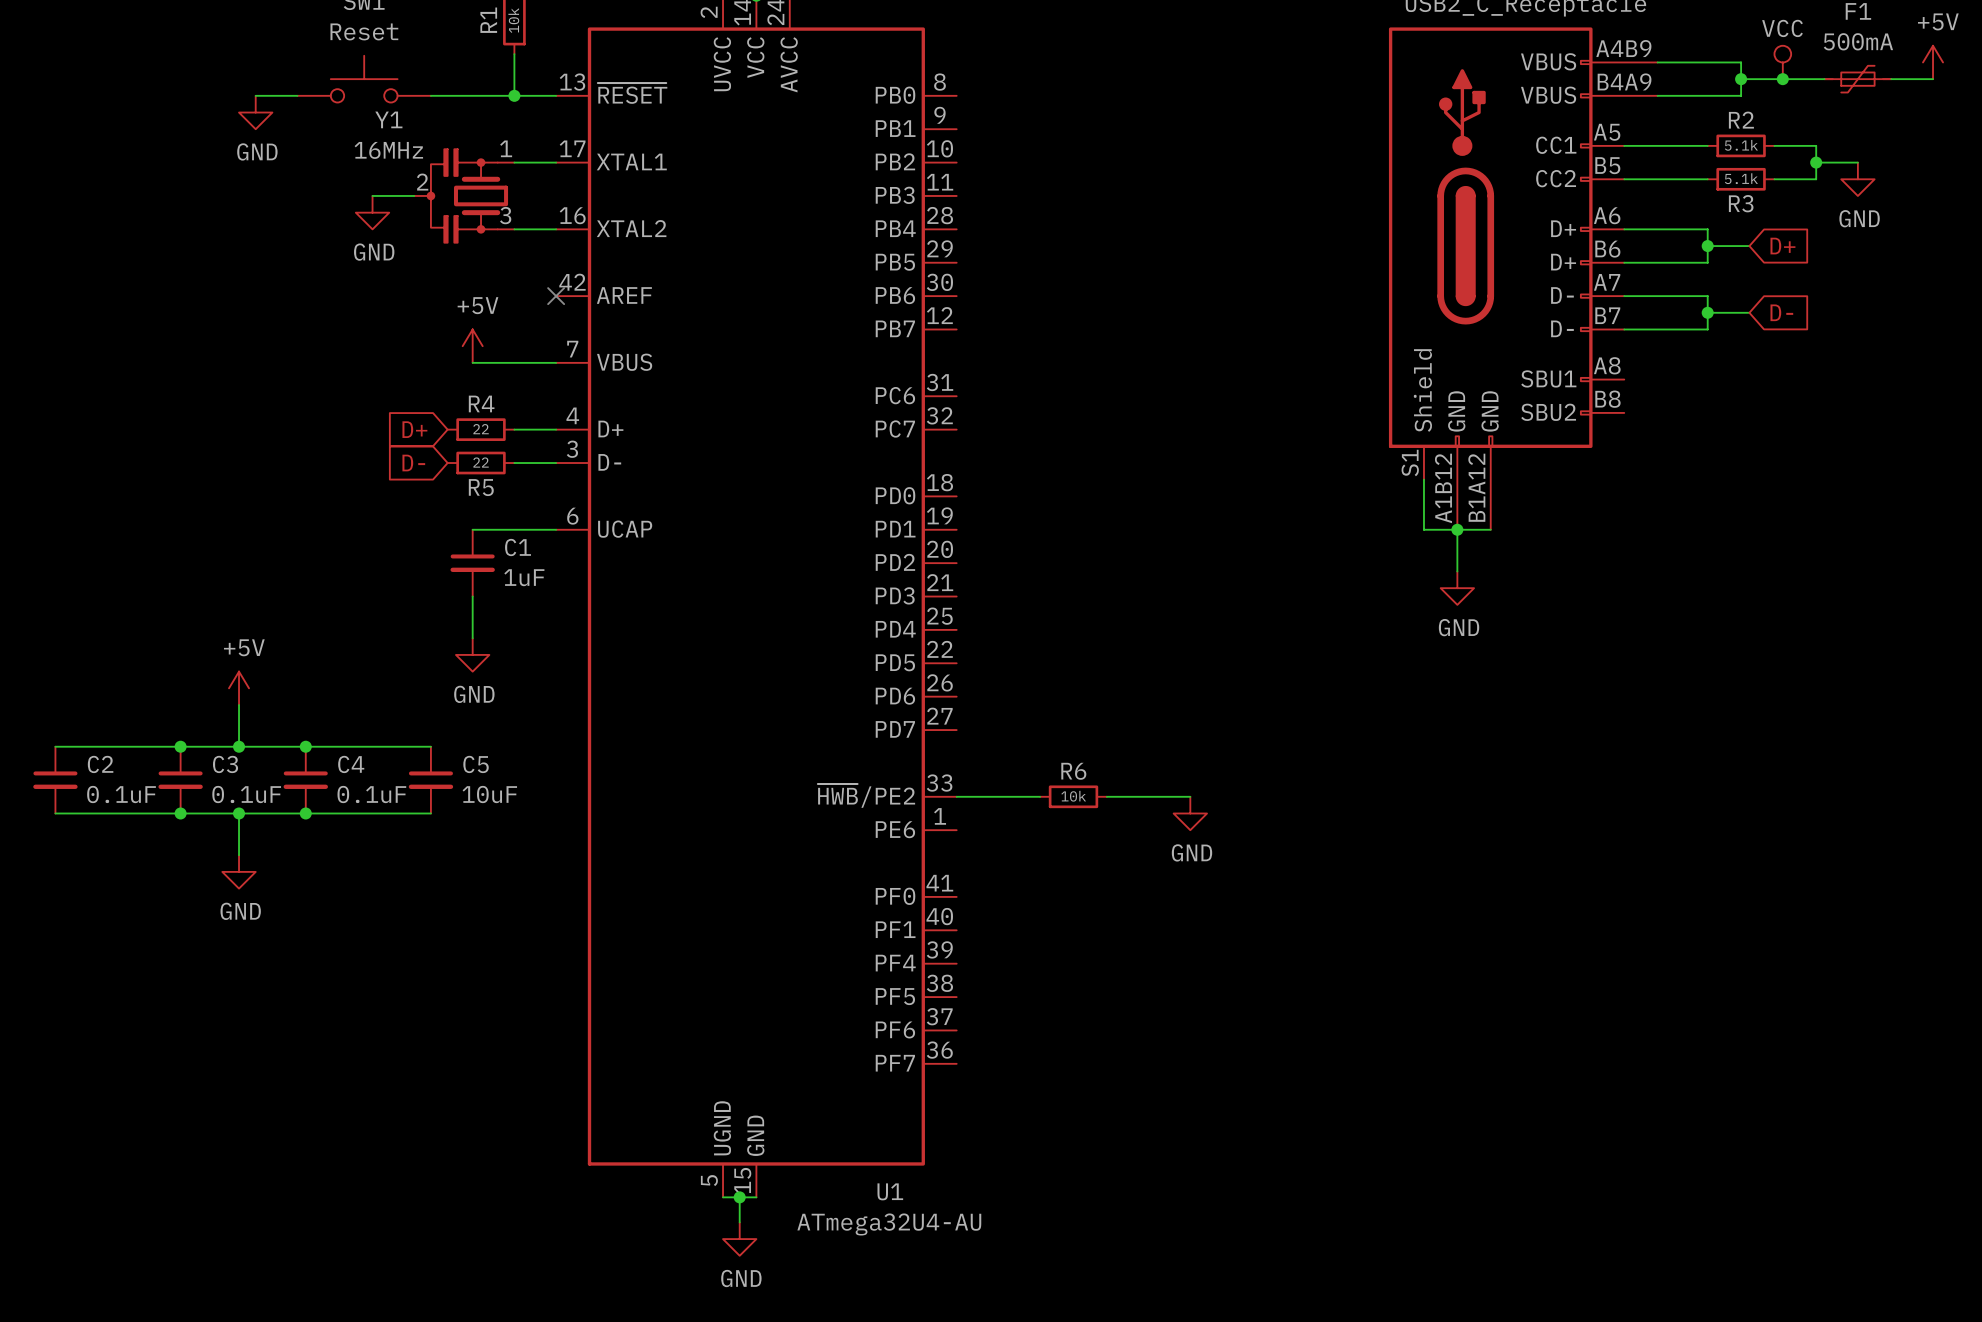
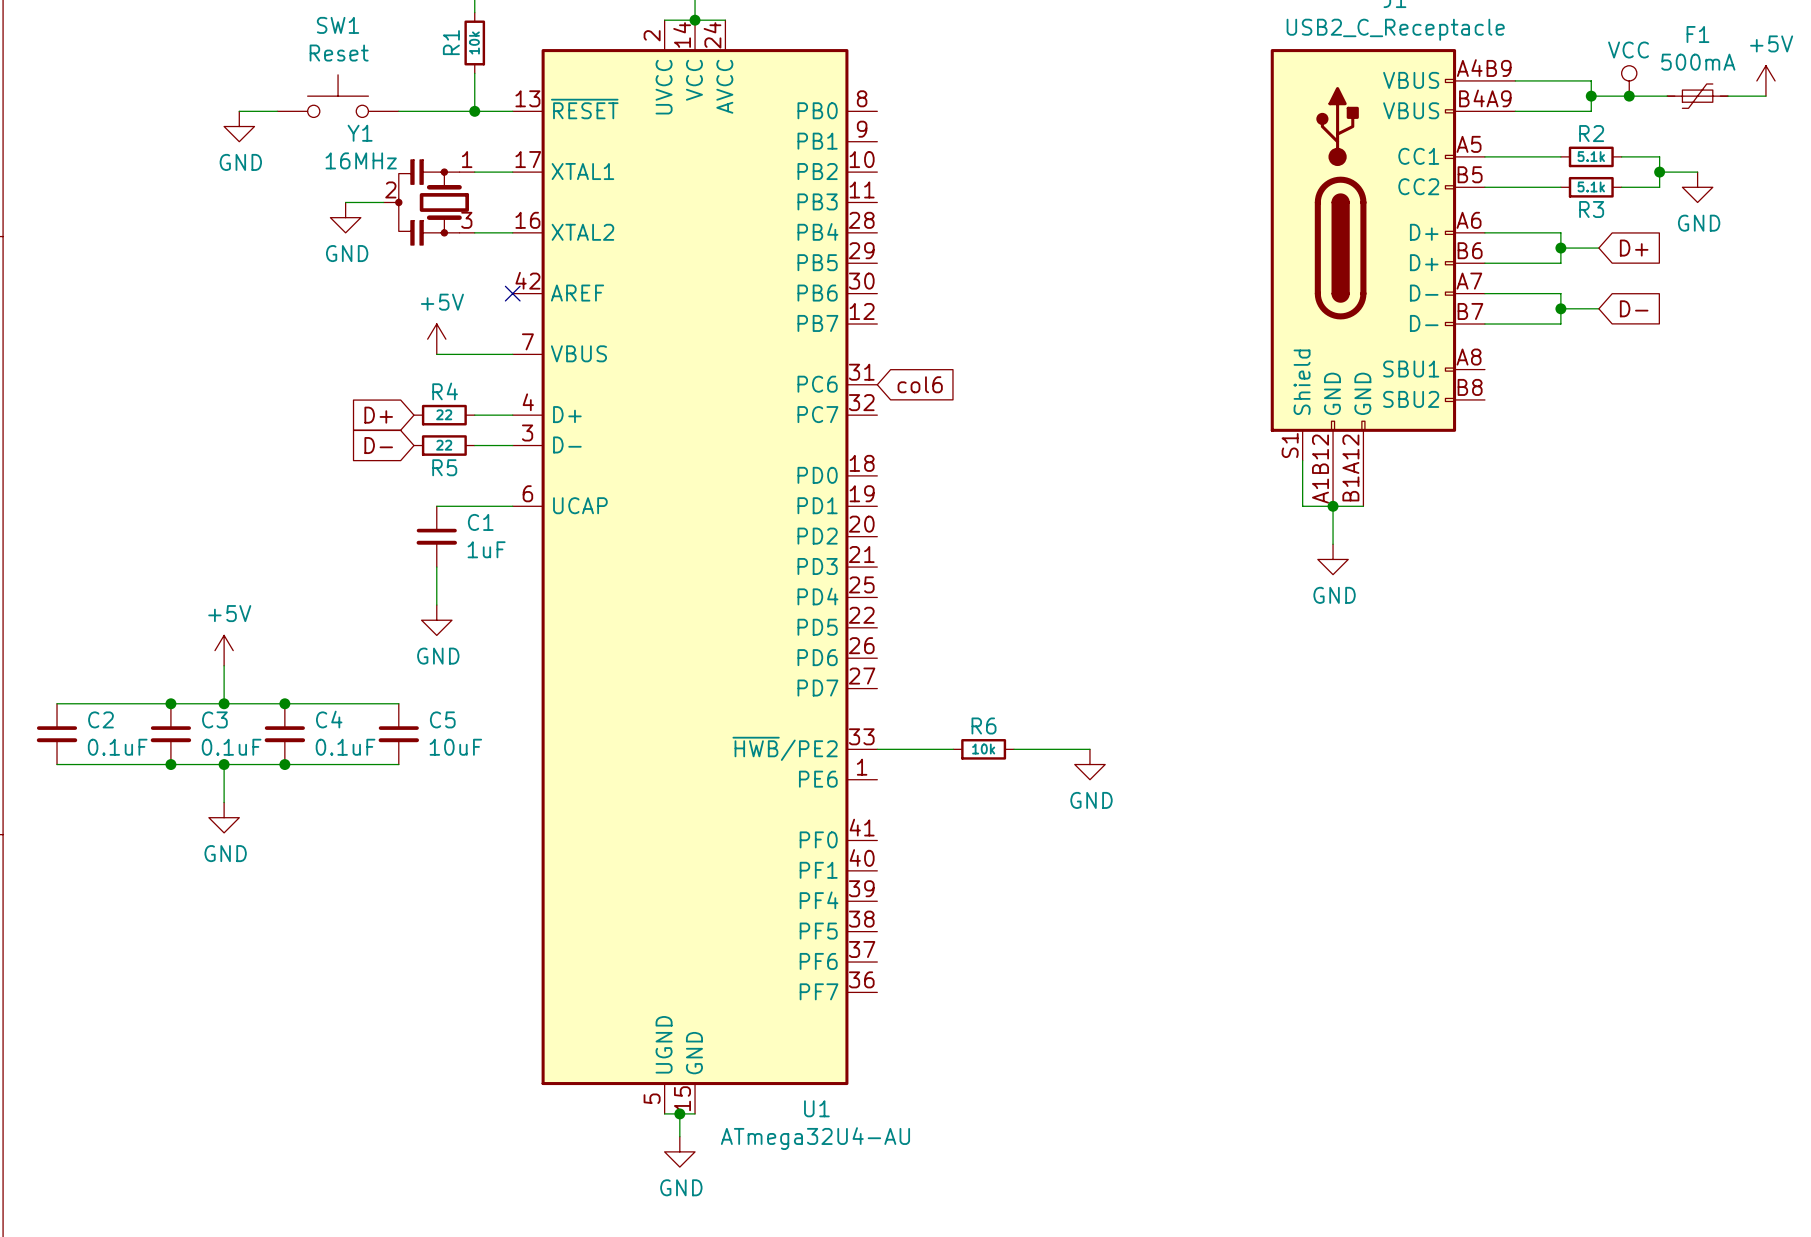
global label: none -> col6 (920, 384)

